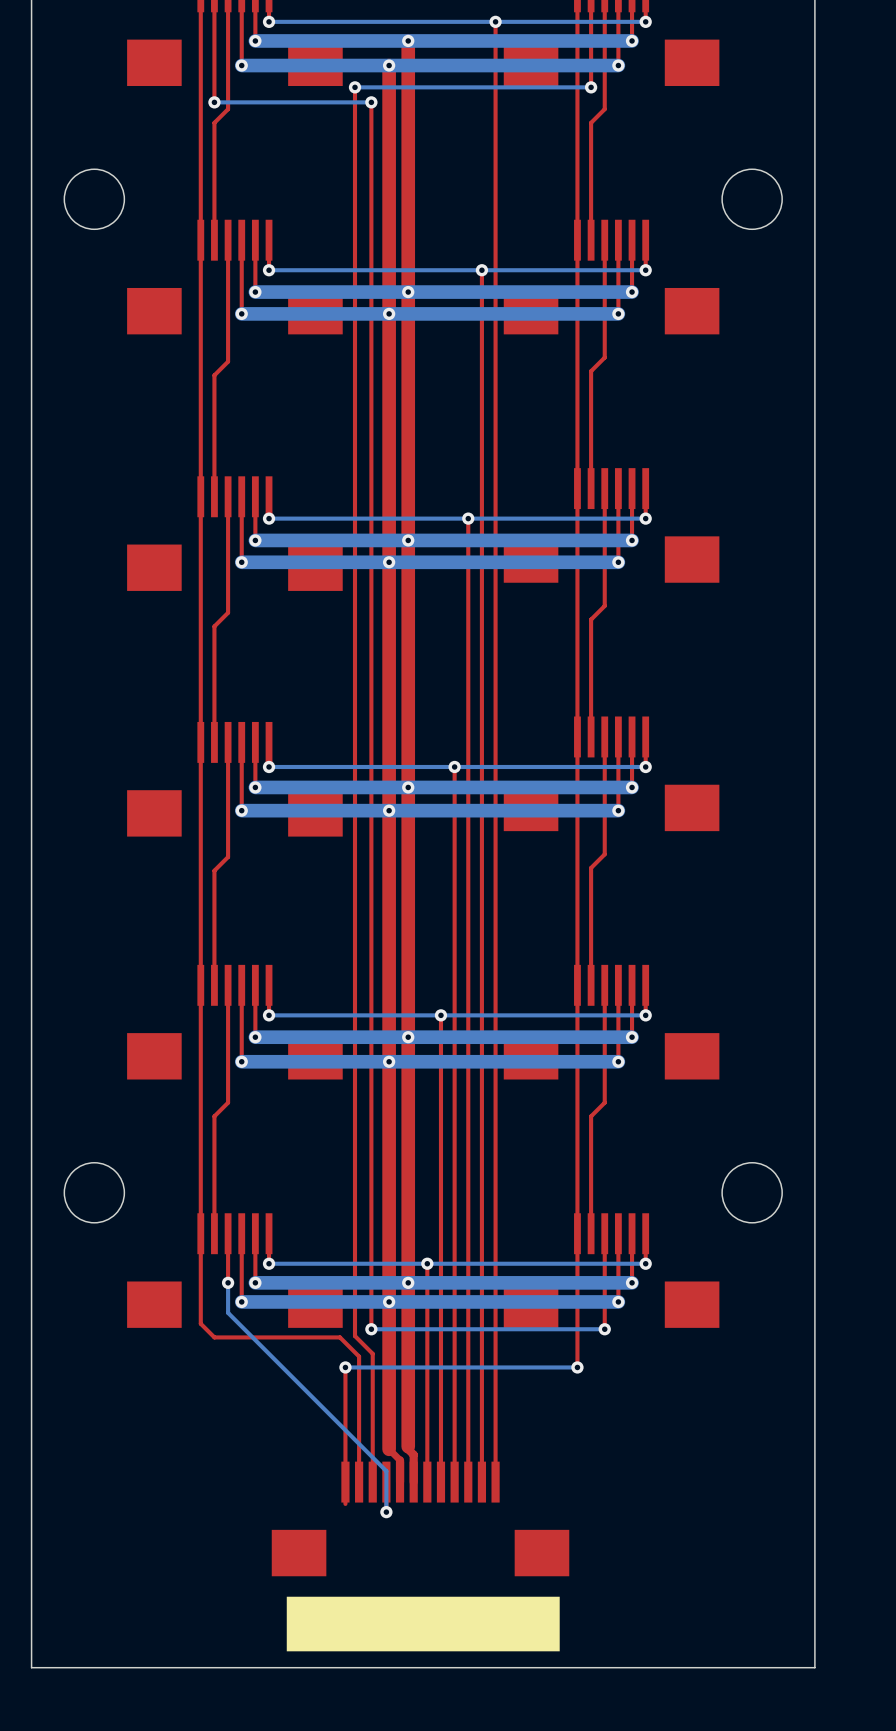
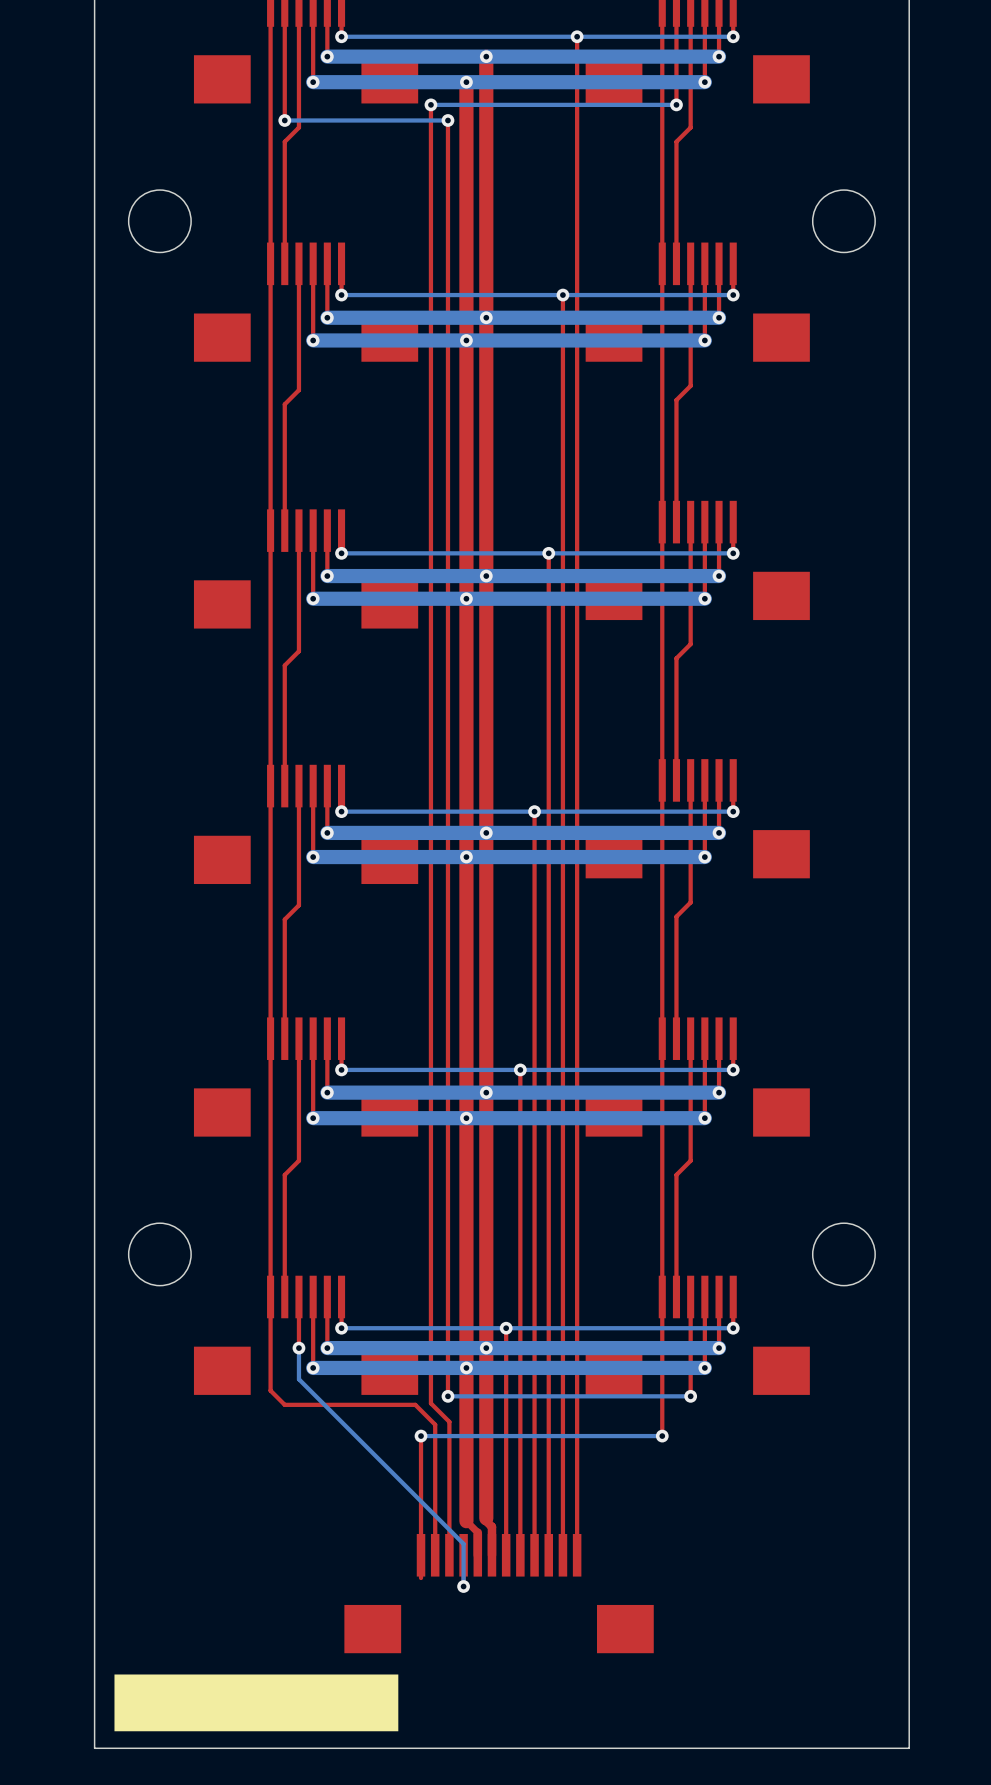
drawing position: (423, 1624) -> (256, 1702)

